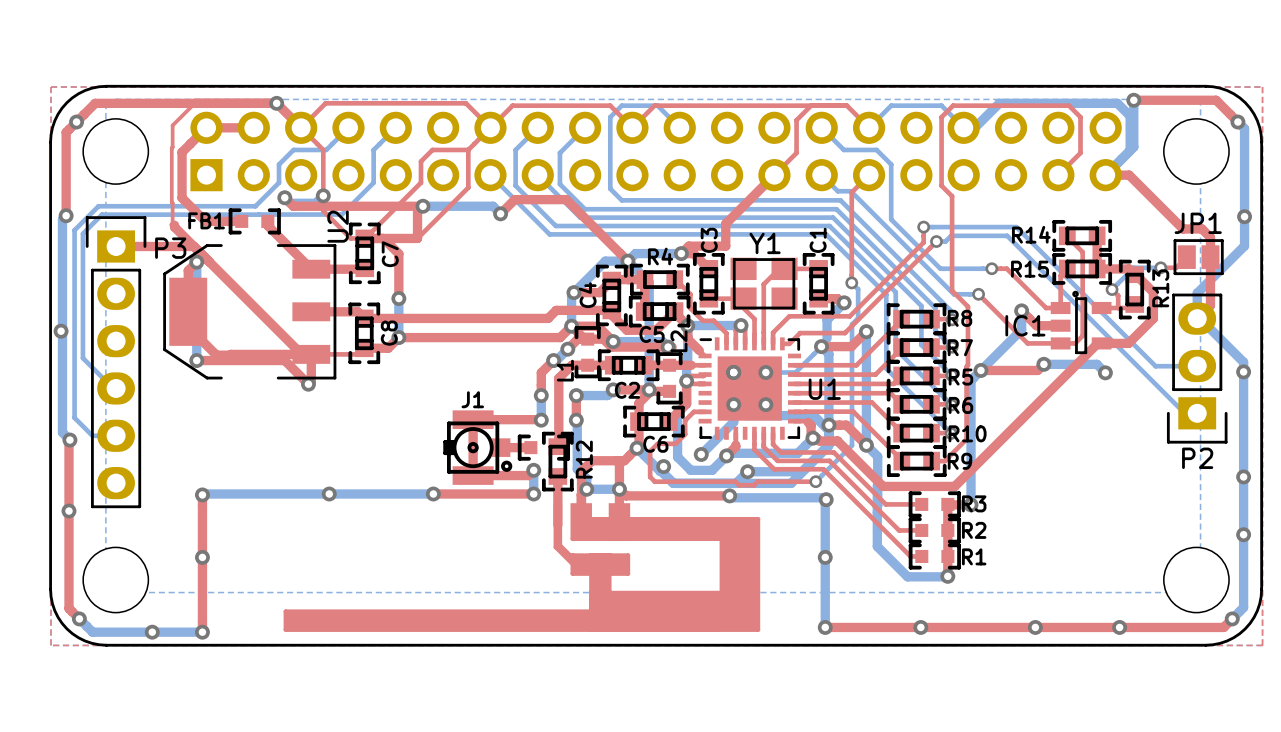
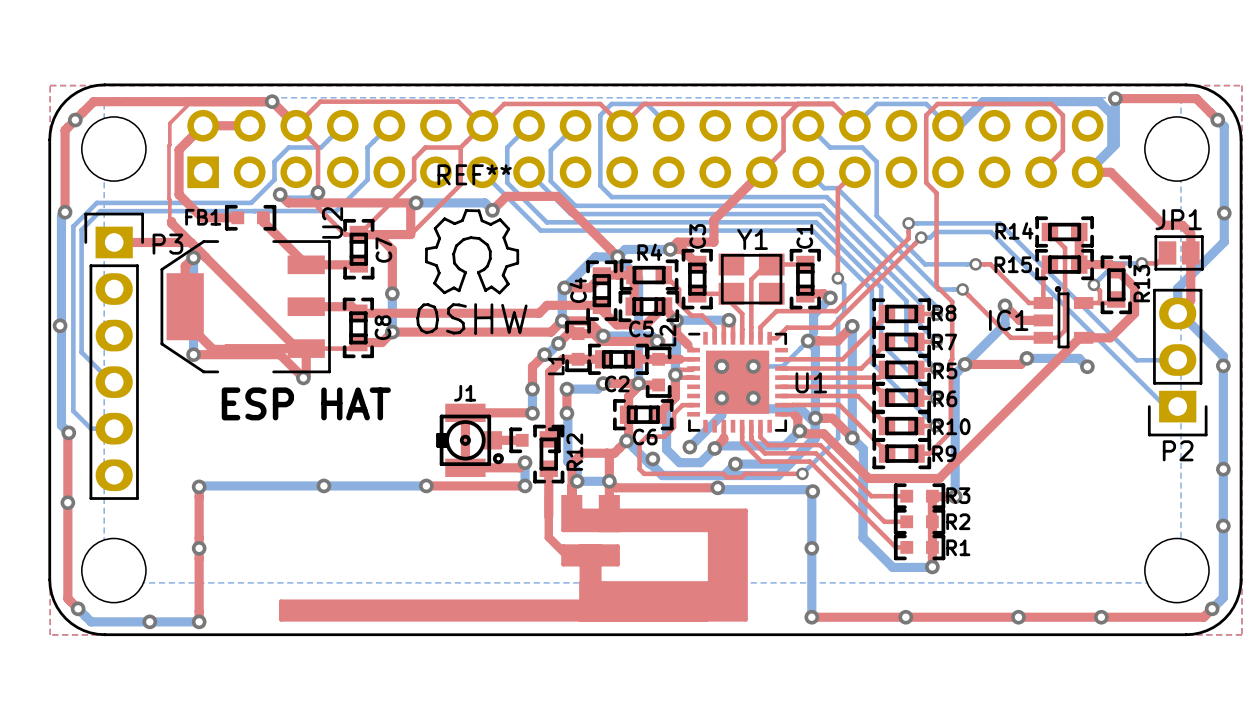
REF**: none -> (471, 271)
text: none -> ESP HAT (306, 403)

